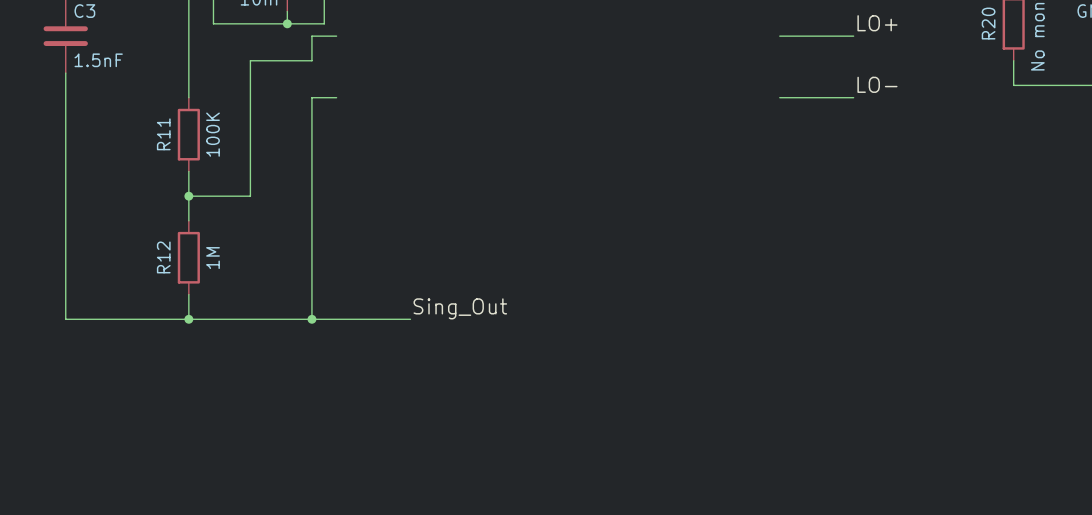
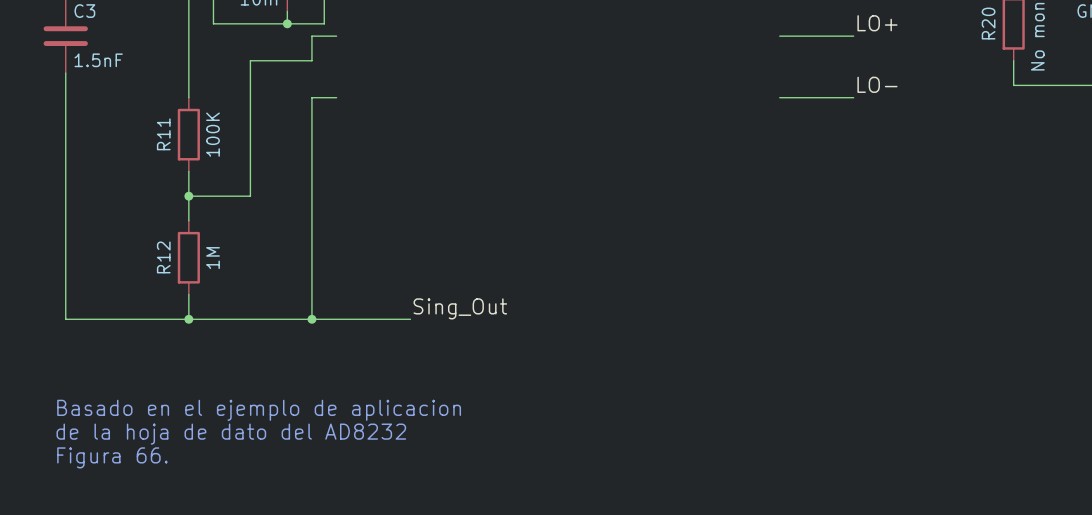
text: none -> Basado en el ejemplo de aplicacion (259, 410)
text: none -> de la hoja de dato del AD8232 (231, 434)
text: none -> Figura 66. (112, 457)

